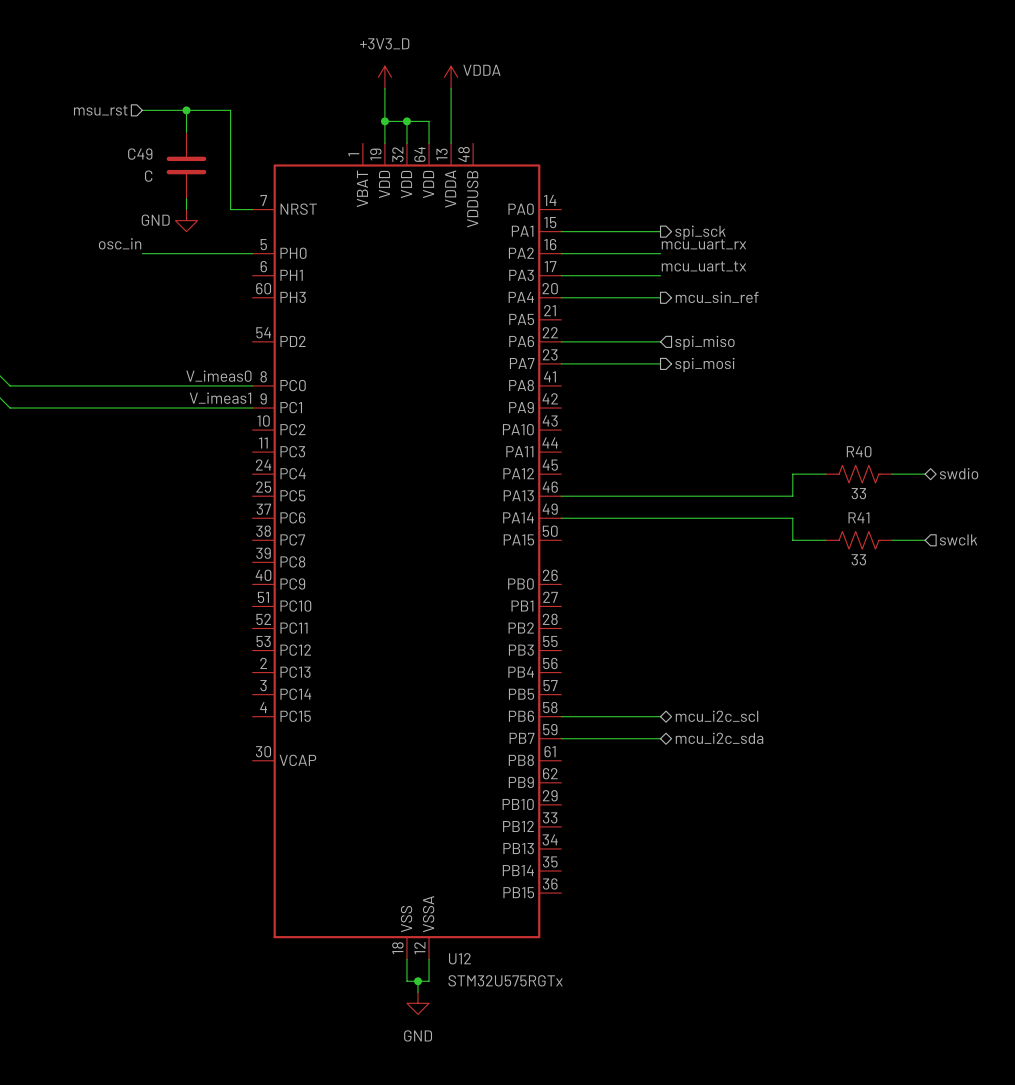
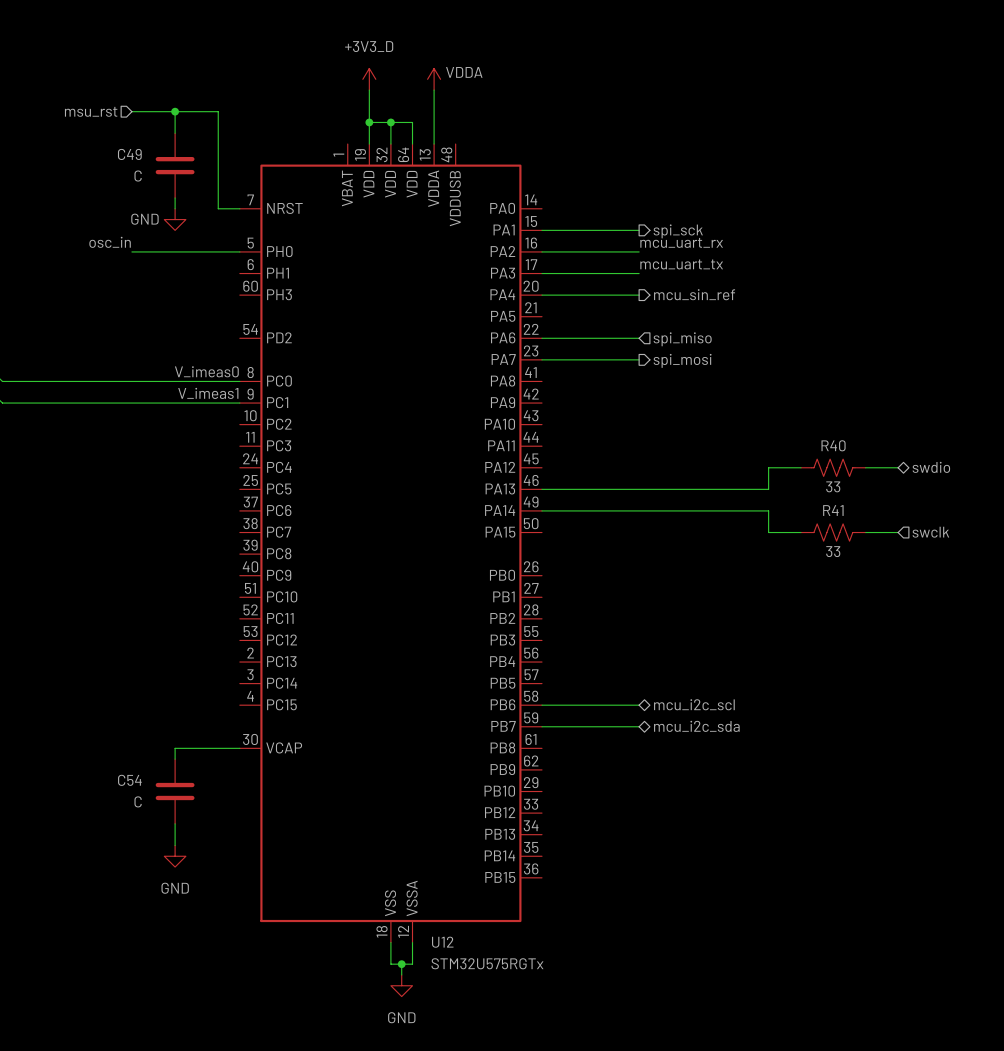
wire: none -> (239, 748) (175, 748) (175, 759)
C54: none -> C (175, 791)
wire: none -> (175, 823) (175, 845)
power symbol: none -> GND (175, 856)

